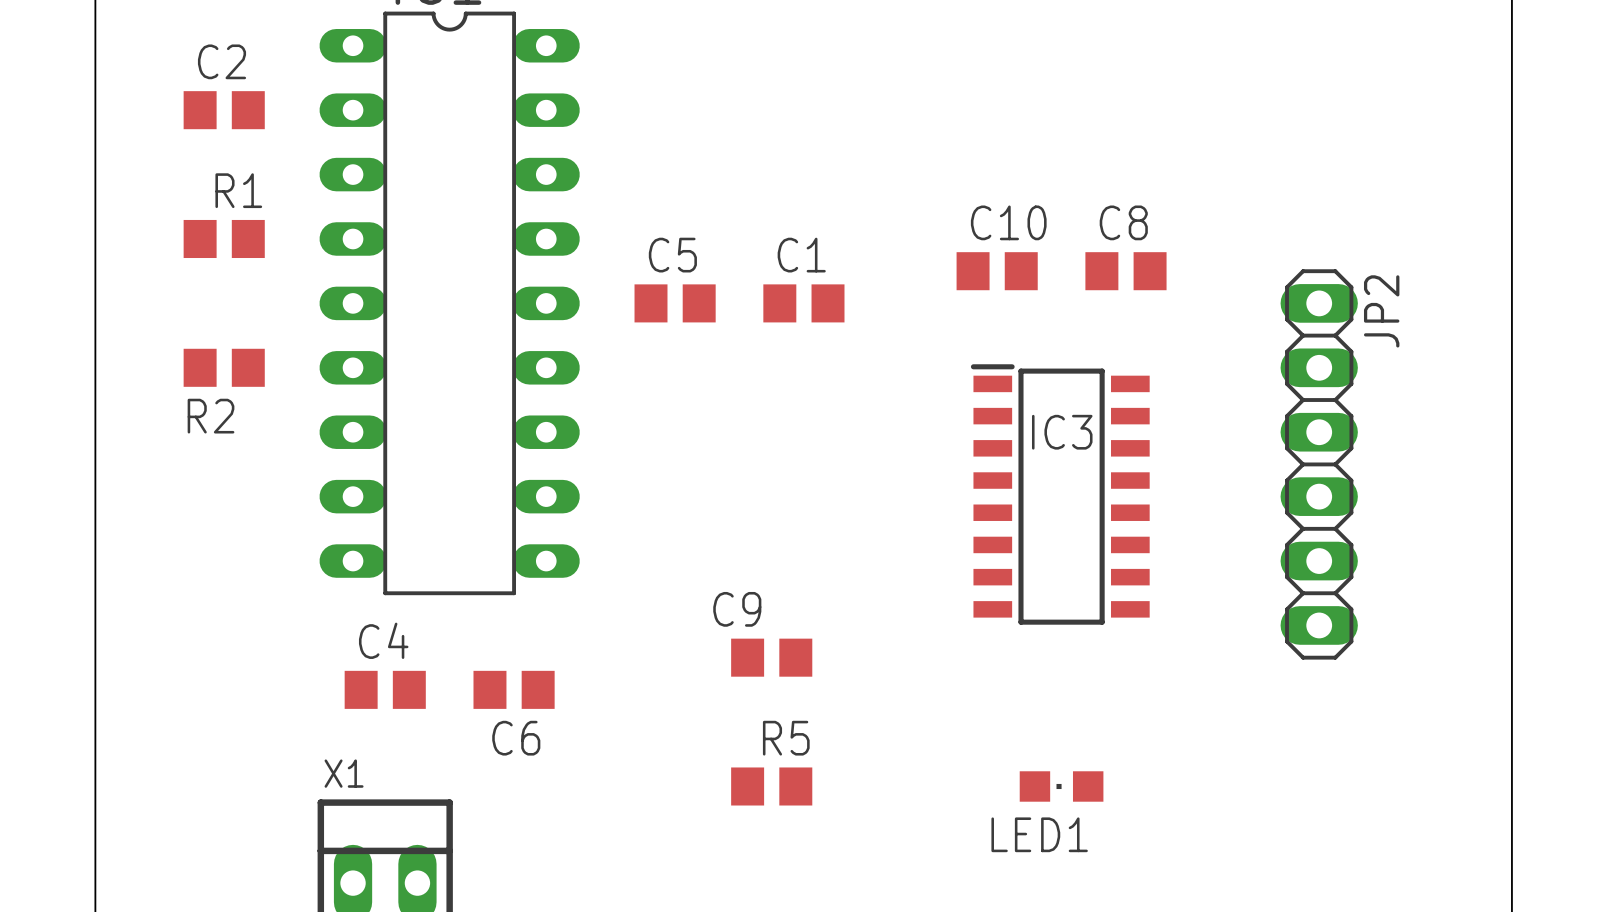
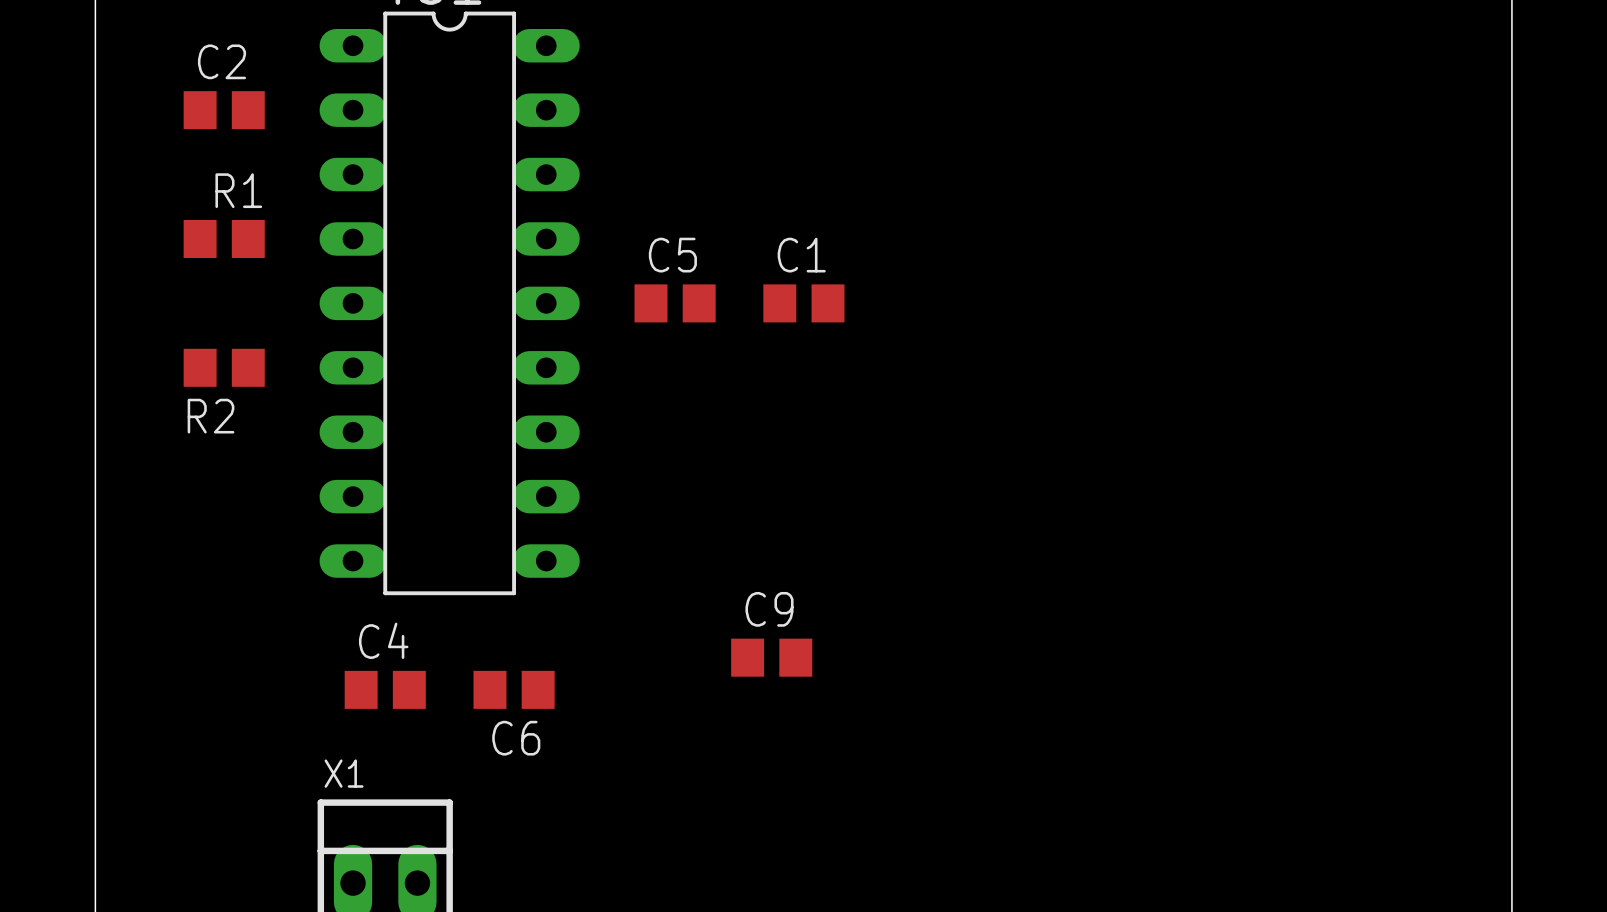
C10: (997, 271) -> none
C8: (1125, 271) -> none
JP2: (1319, 464) -> none
IC3: (1060, 494) -> none
C9 name position: C9 (737, 609) -> C9 (769, 609)
R5: (771, 786) -> none
LED1: (1061, 786) -> none

